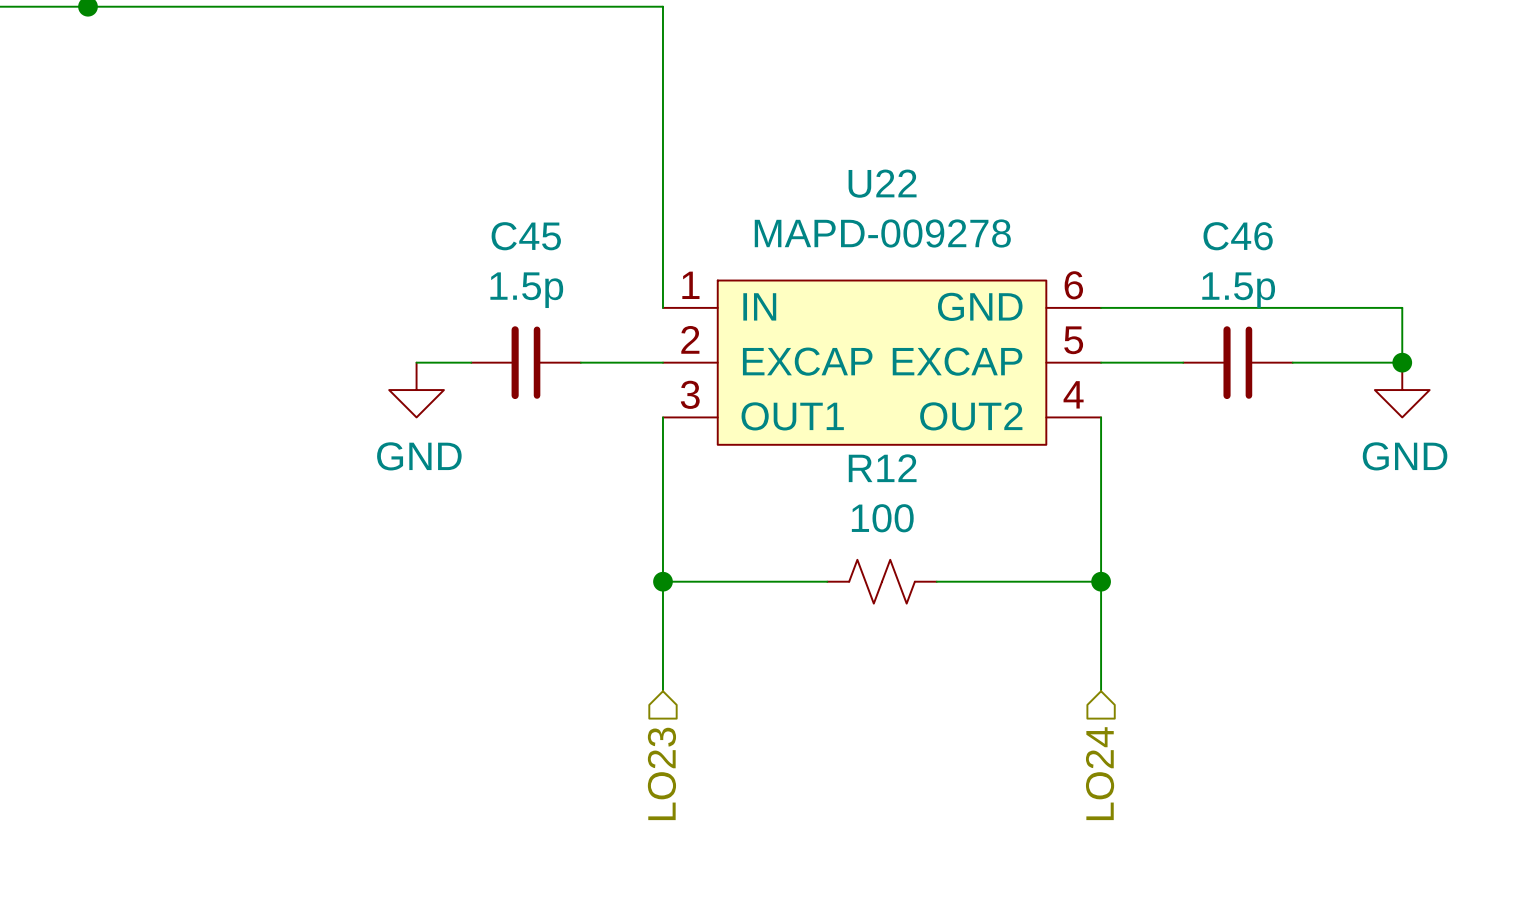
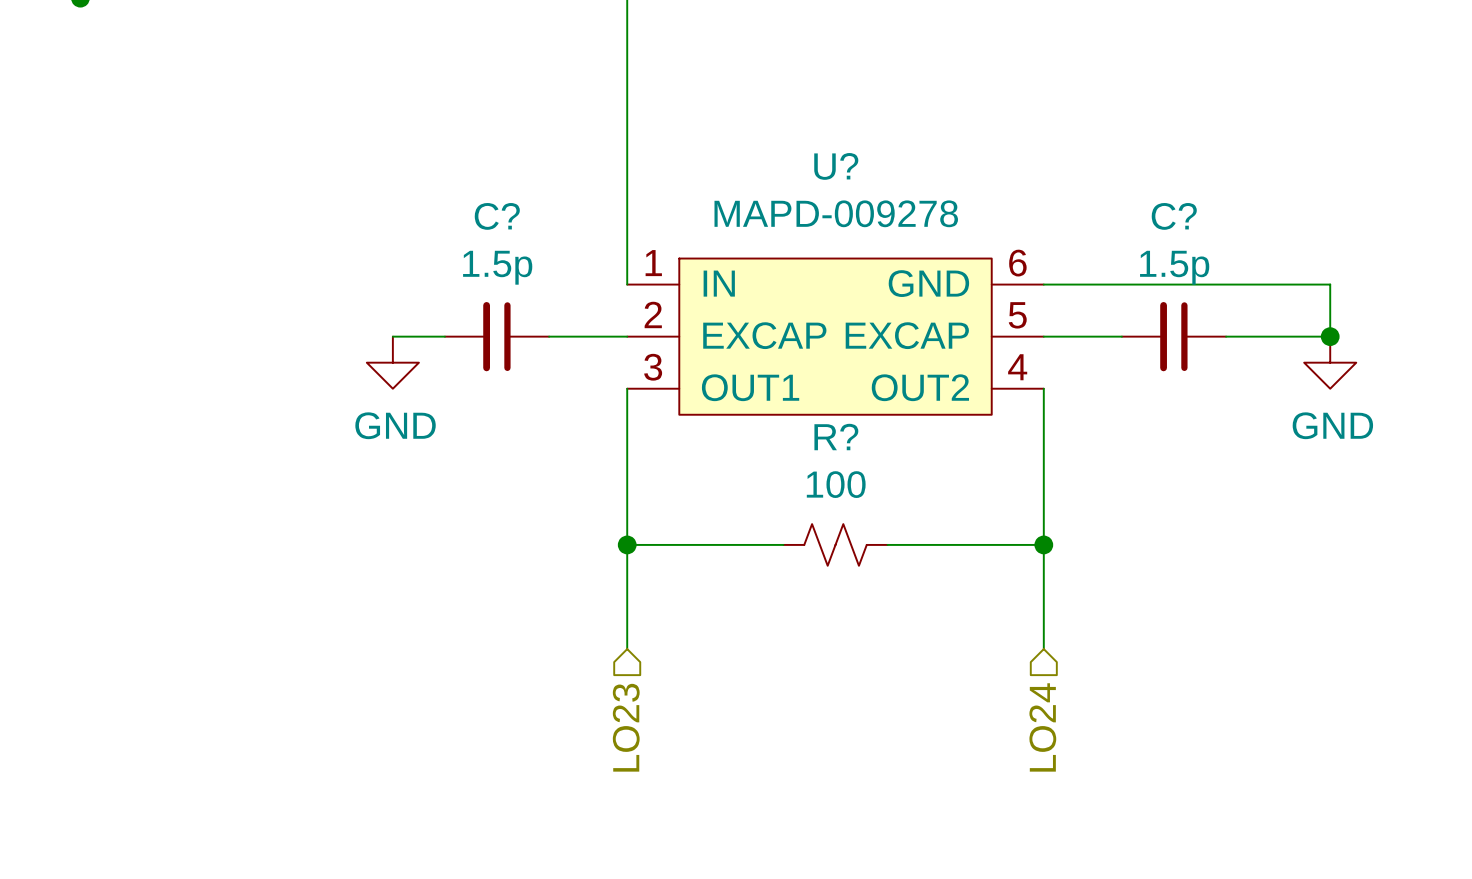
U22 name: U22 (882, 183) -> U? (836, 166)
C45 name: C45 (526, 236) -> C? (497, 216)
C46 name: C46 (1238, 236) -> C? (1174, 216)
R12 name: R12 (882, 468) -> R? (836, 437)

